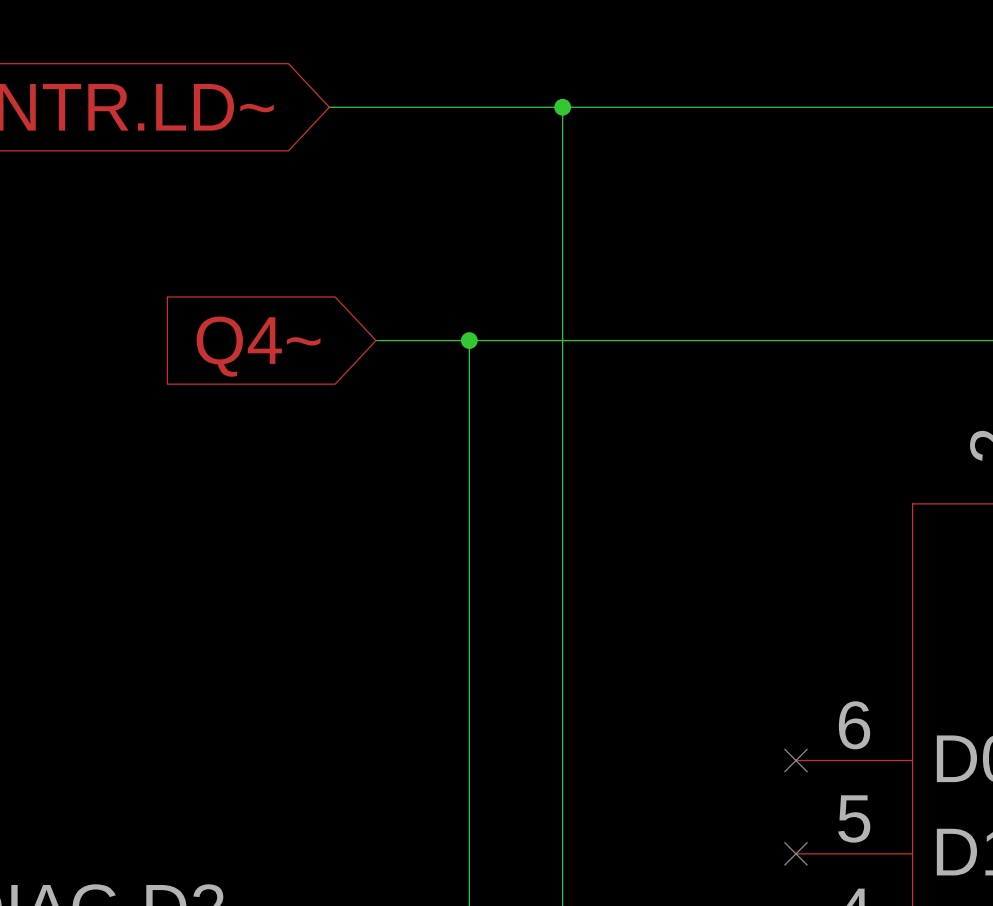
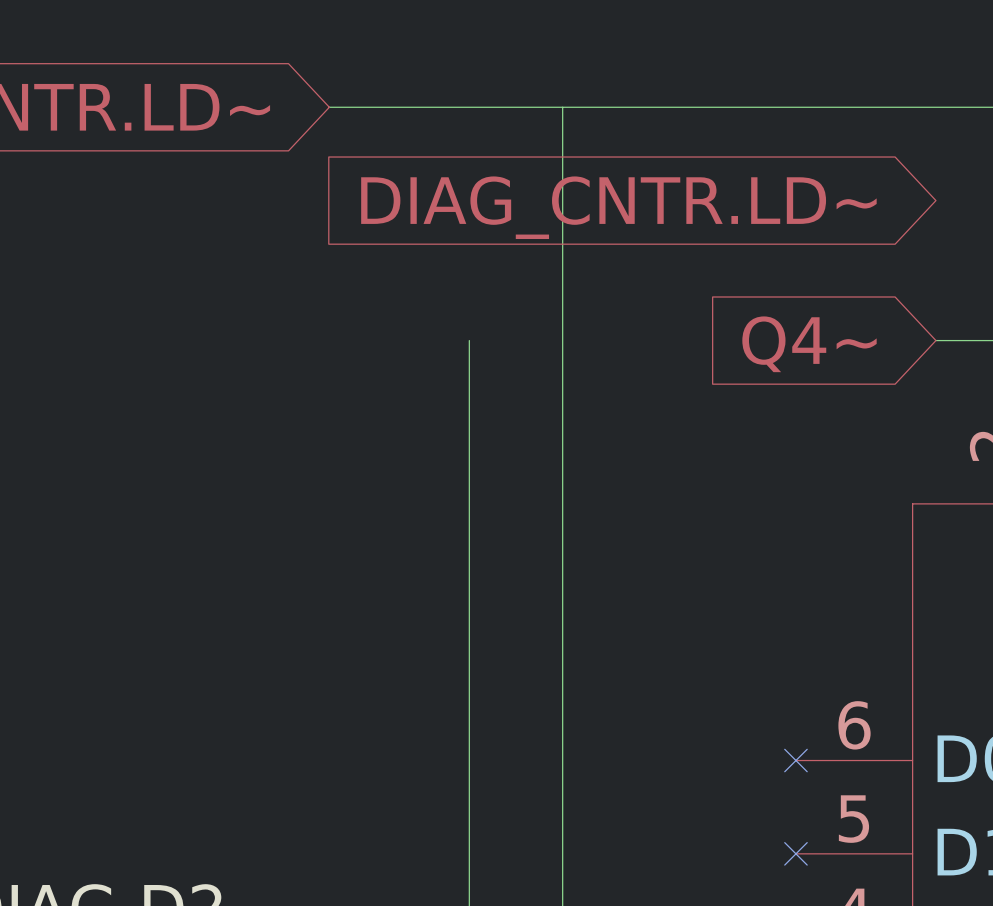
junction: (562, 107) -> none
global label: none -> DIAG_CNTR.LD~ (618, 207)
wire: (376, 340) (935, 340) -> none
junction: (469, 340) -> none
global label: Q4~ (258, 346) -> none
global label: none -> Q4~ (809, 344)

